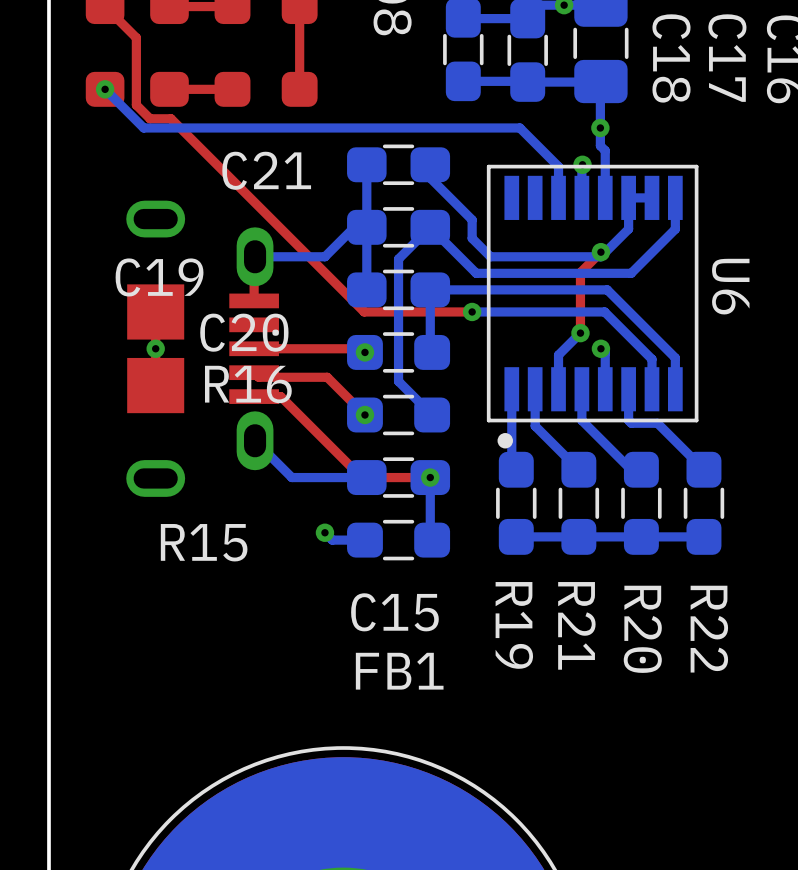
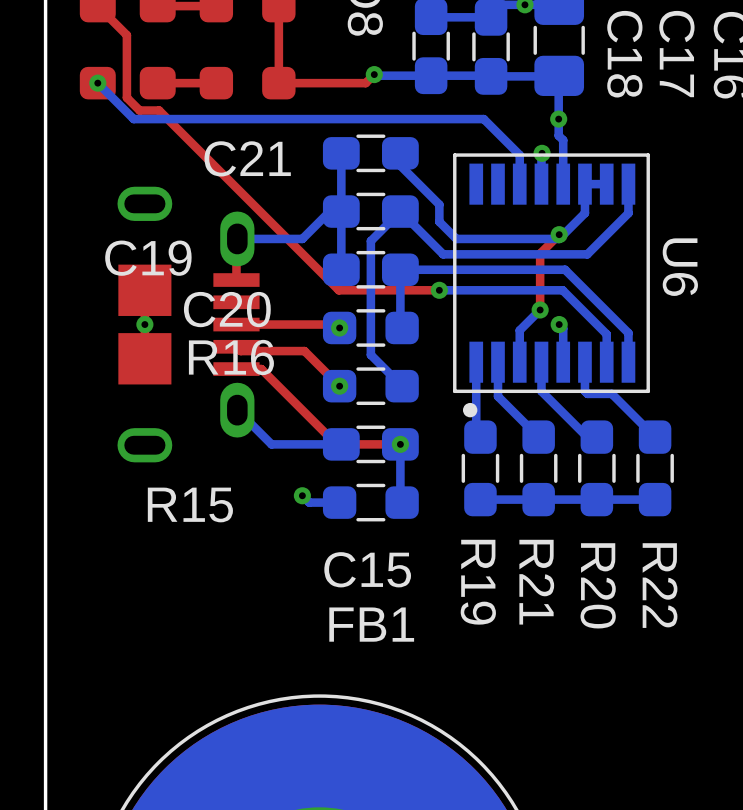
top track: none -> (374, 74) (365, 83) (278, 83)
bottom track: none -> (374, 74) (431, 75)
via: none -> (374, 74)

